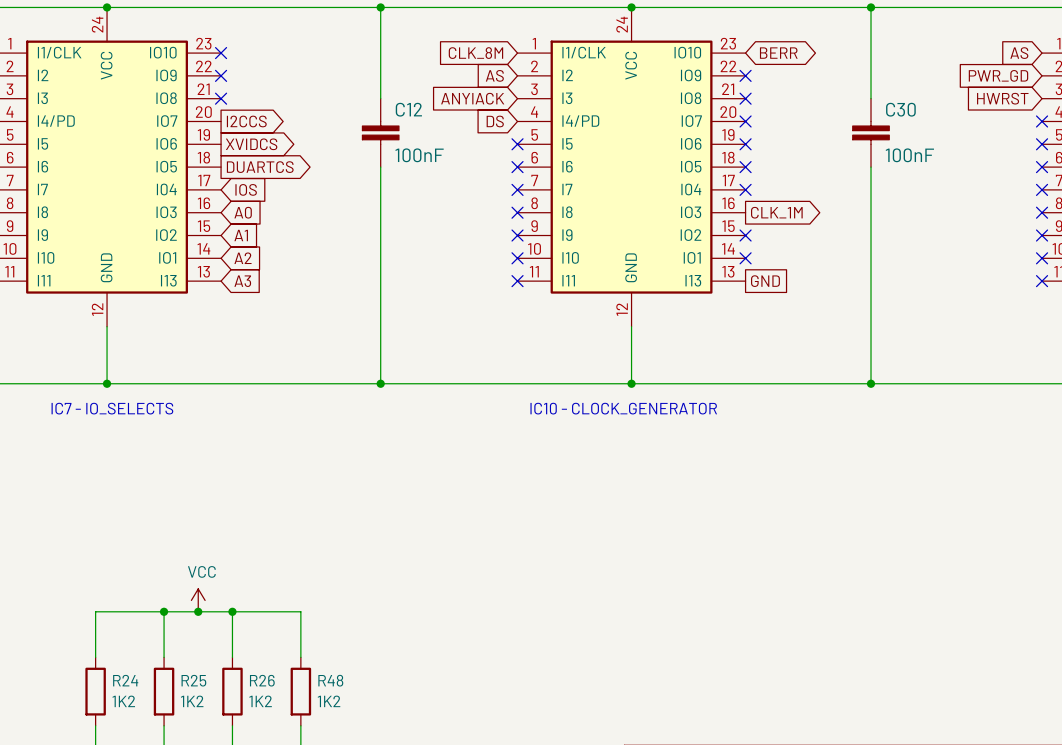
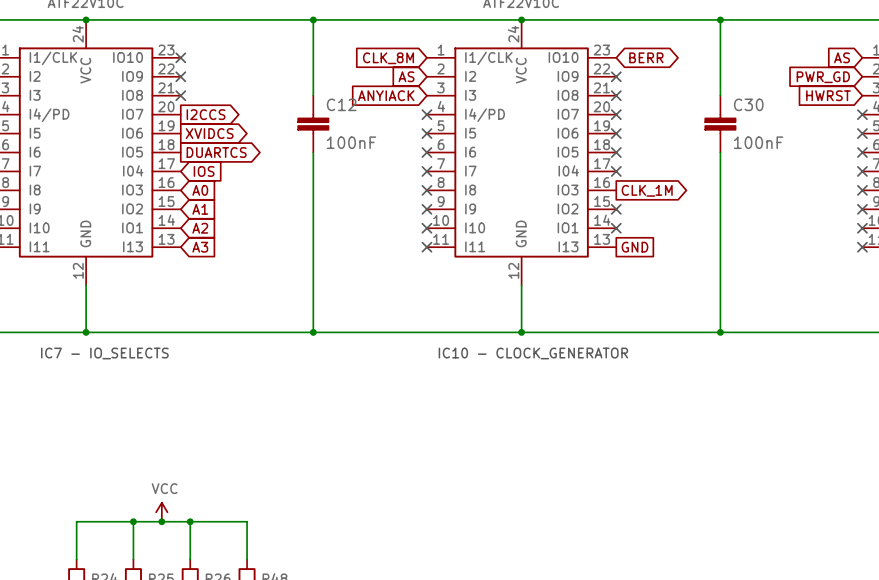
global label: DS (495, 121) -> none
no-connect mark: none -> (426, 114)

